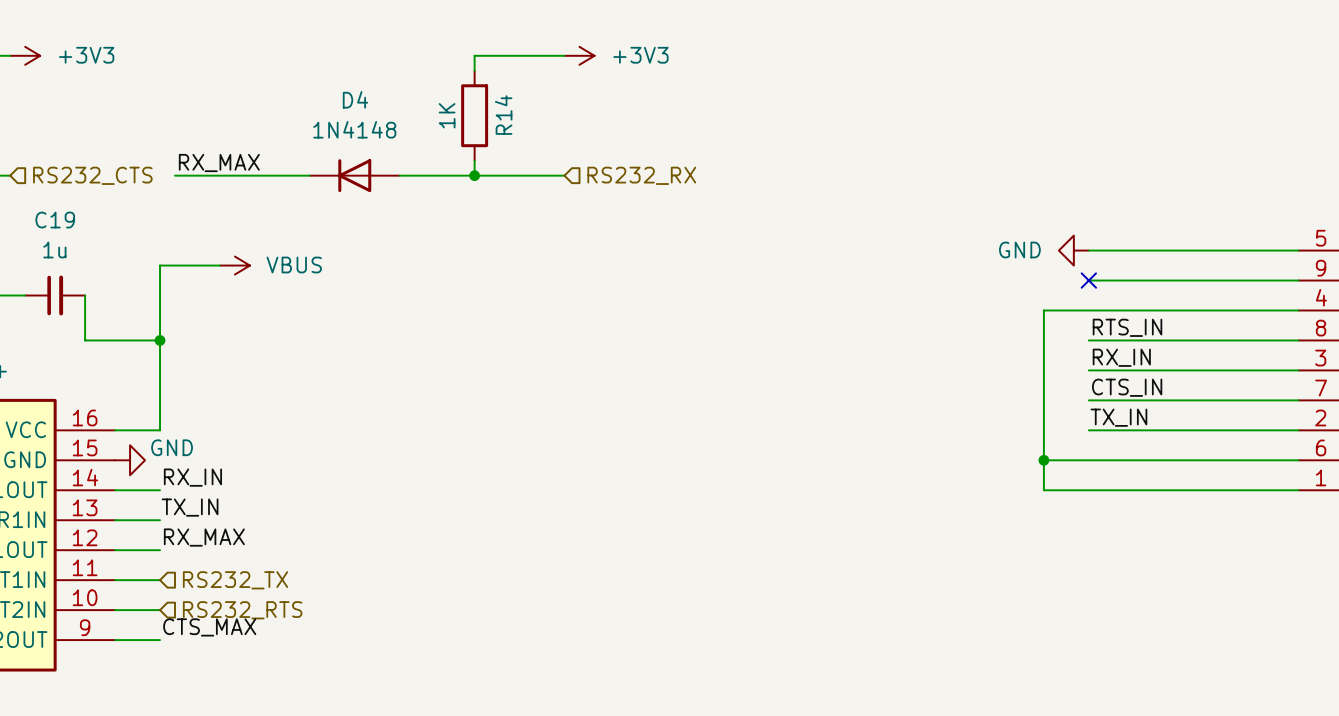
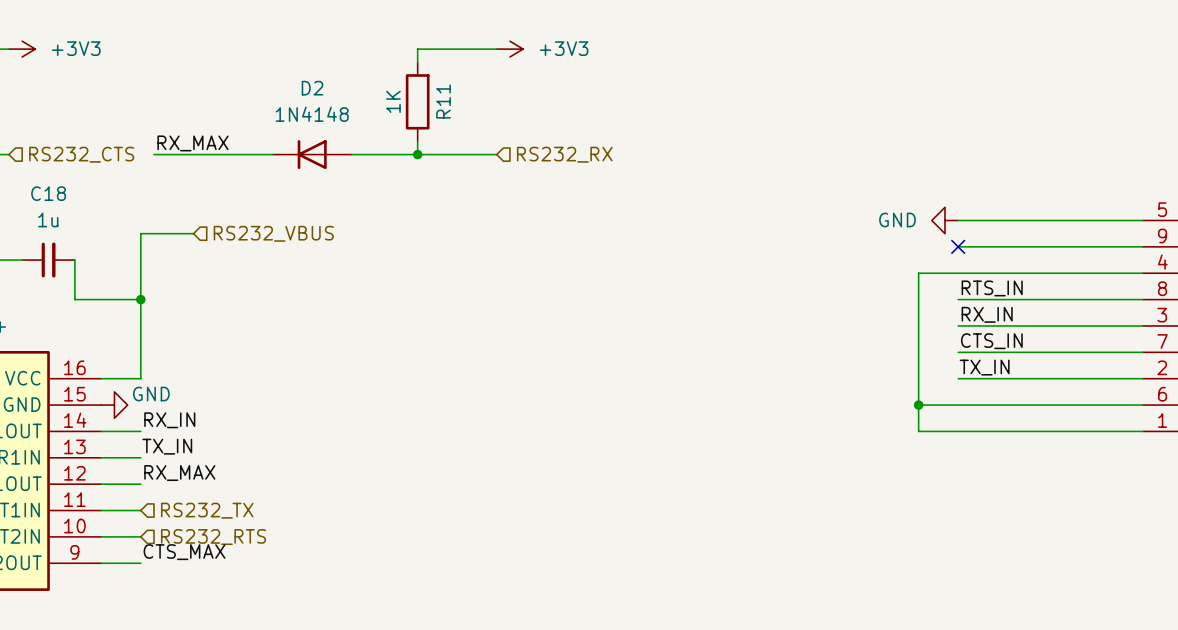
D4 name: D4 (355, 99) -> D2 (312, 88)
R14 name: R14 (503, 115) -> R11 (443, 101)
C19 name: C19 (55, 220) -> C18 (48, 193)
power symbol: VBUS (234, 265) -> none
hierarchical label: none -> RS232_VBUS (273, 233)

